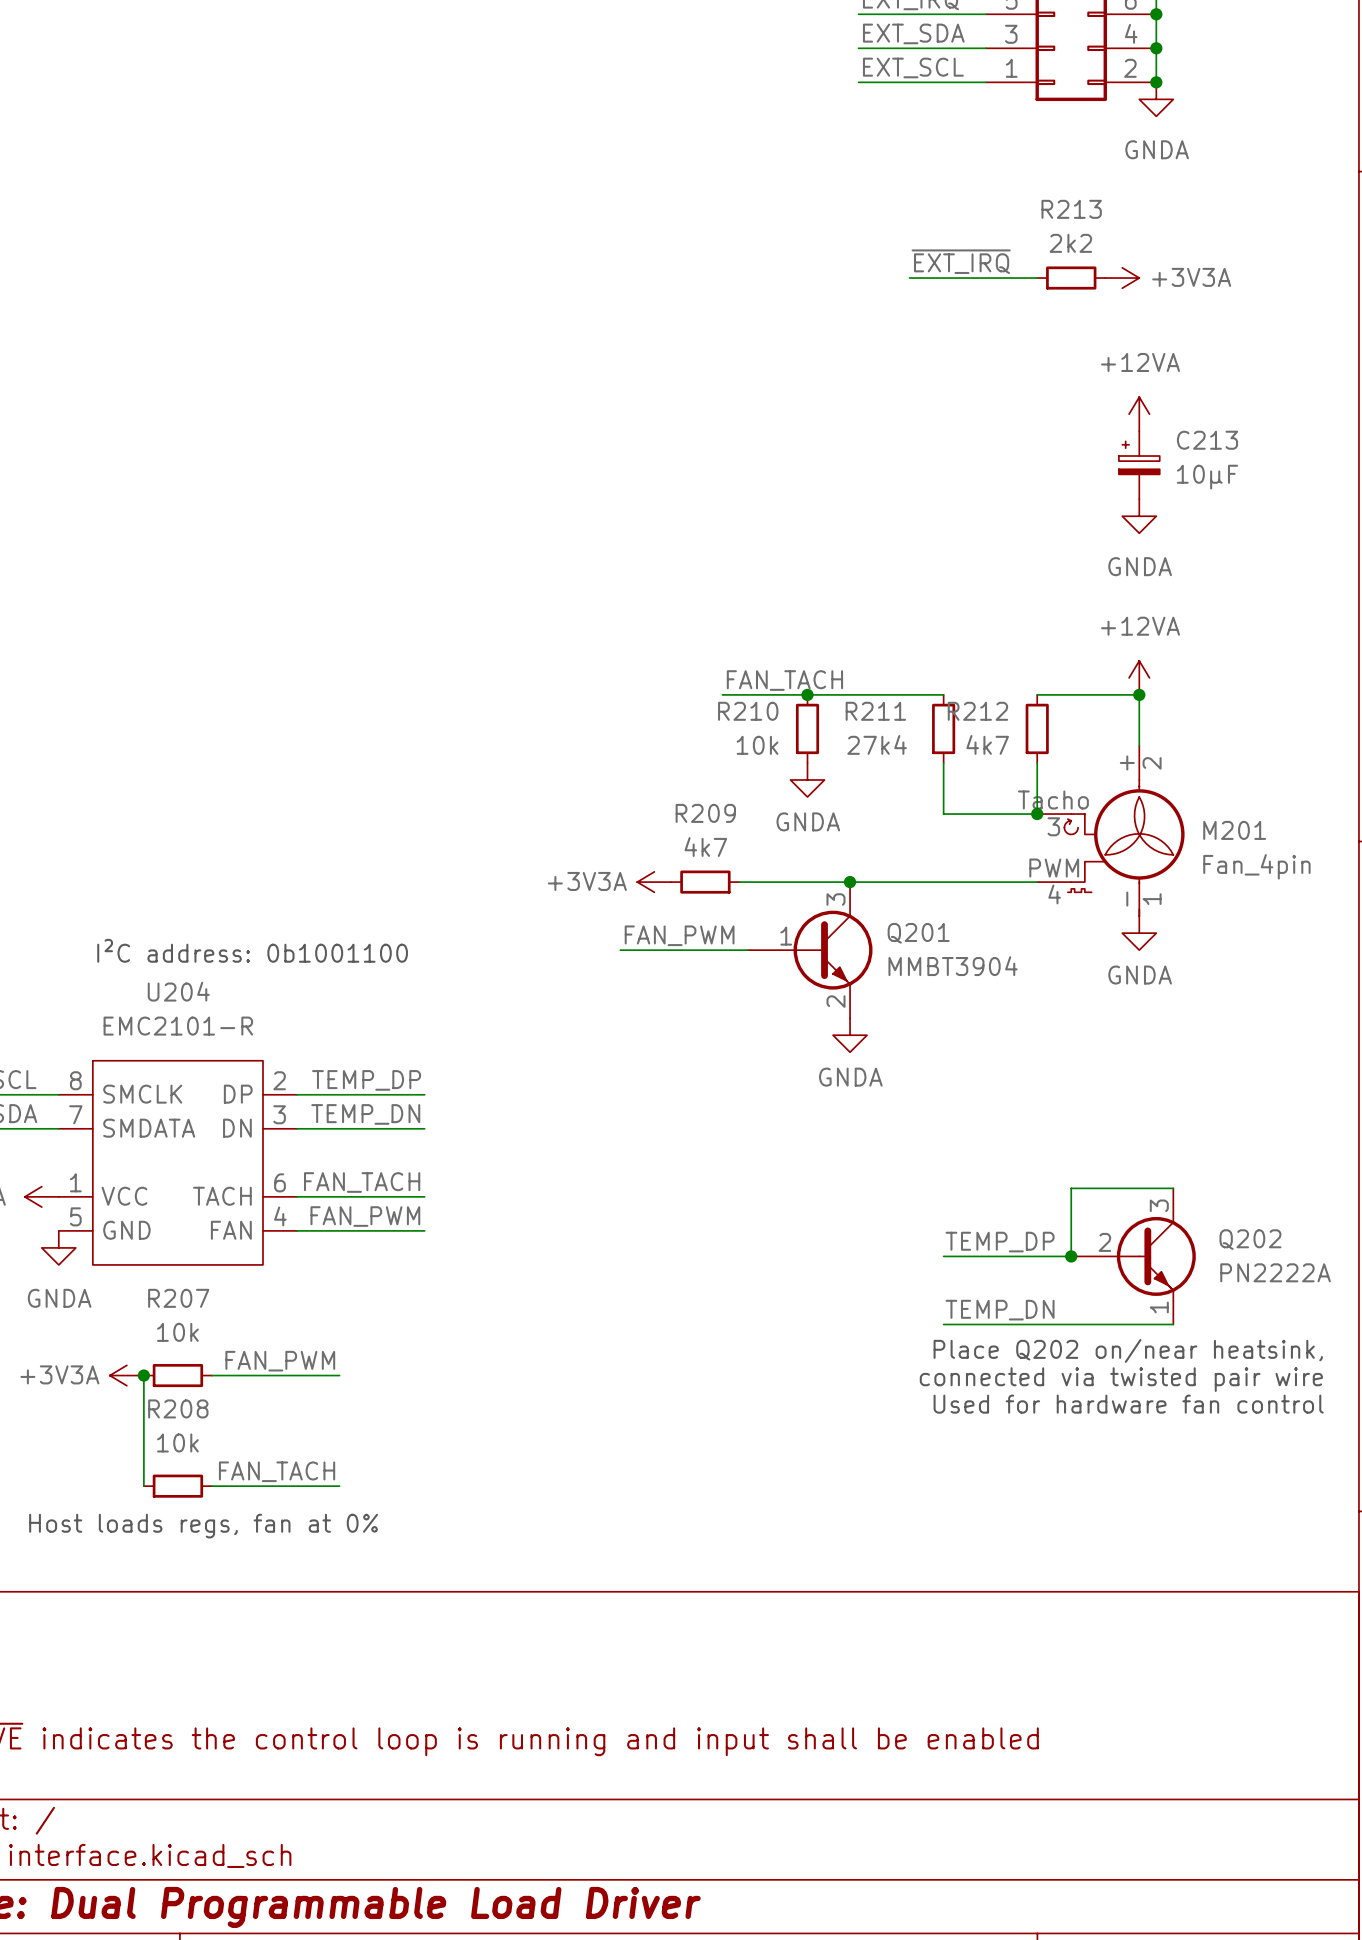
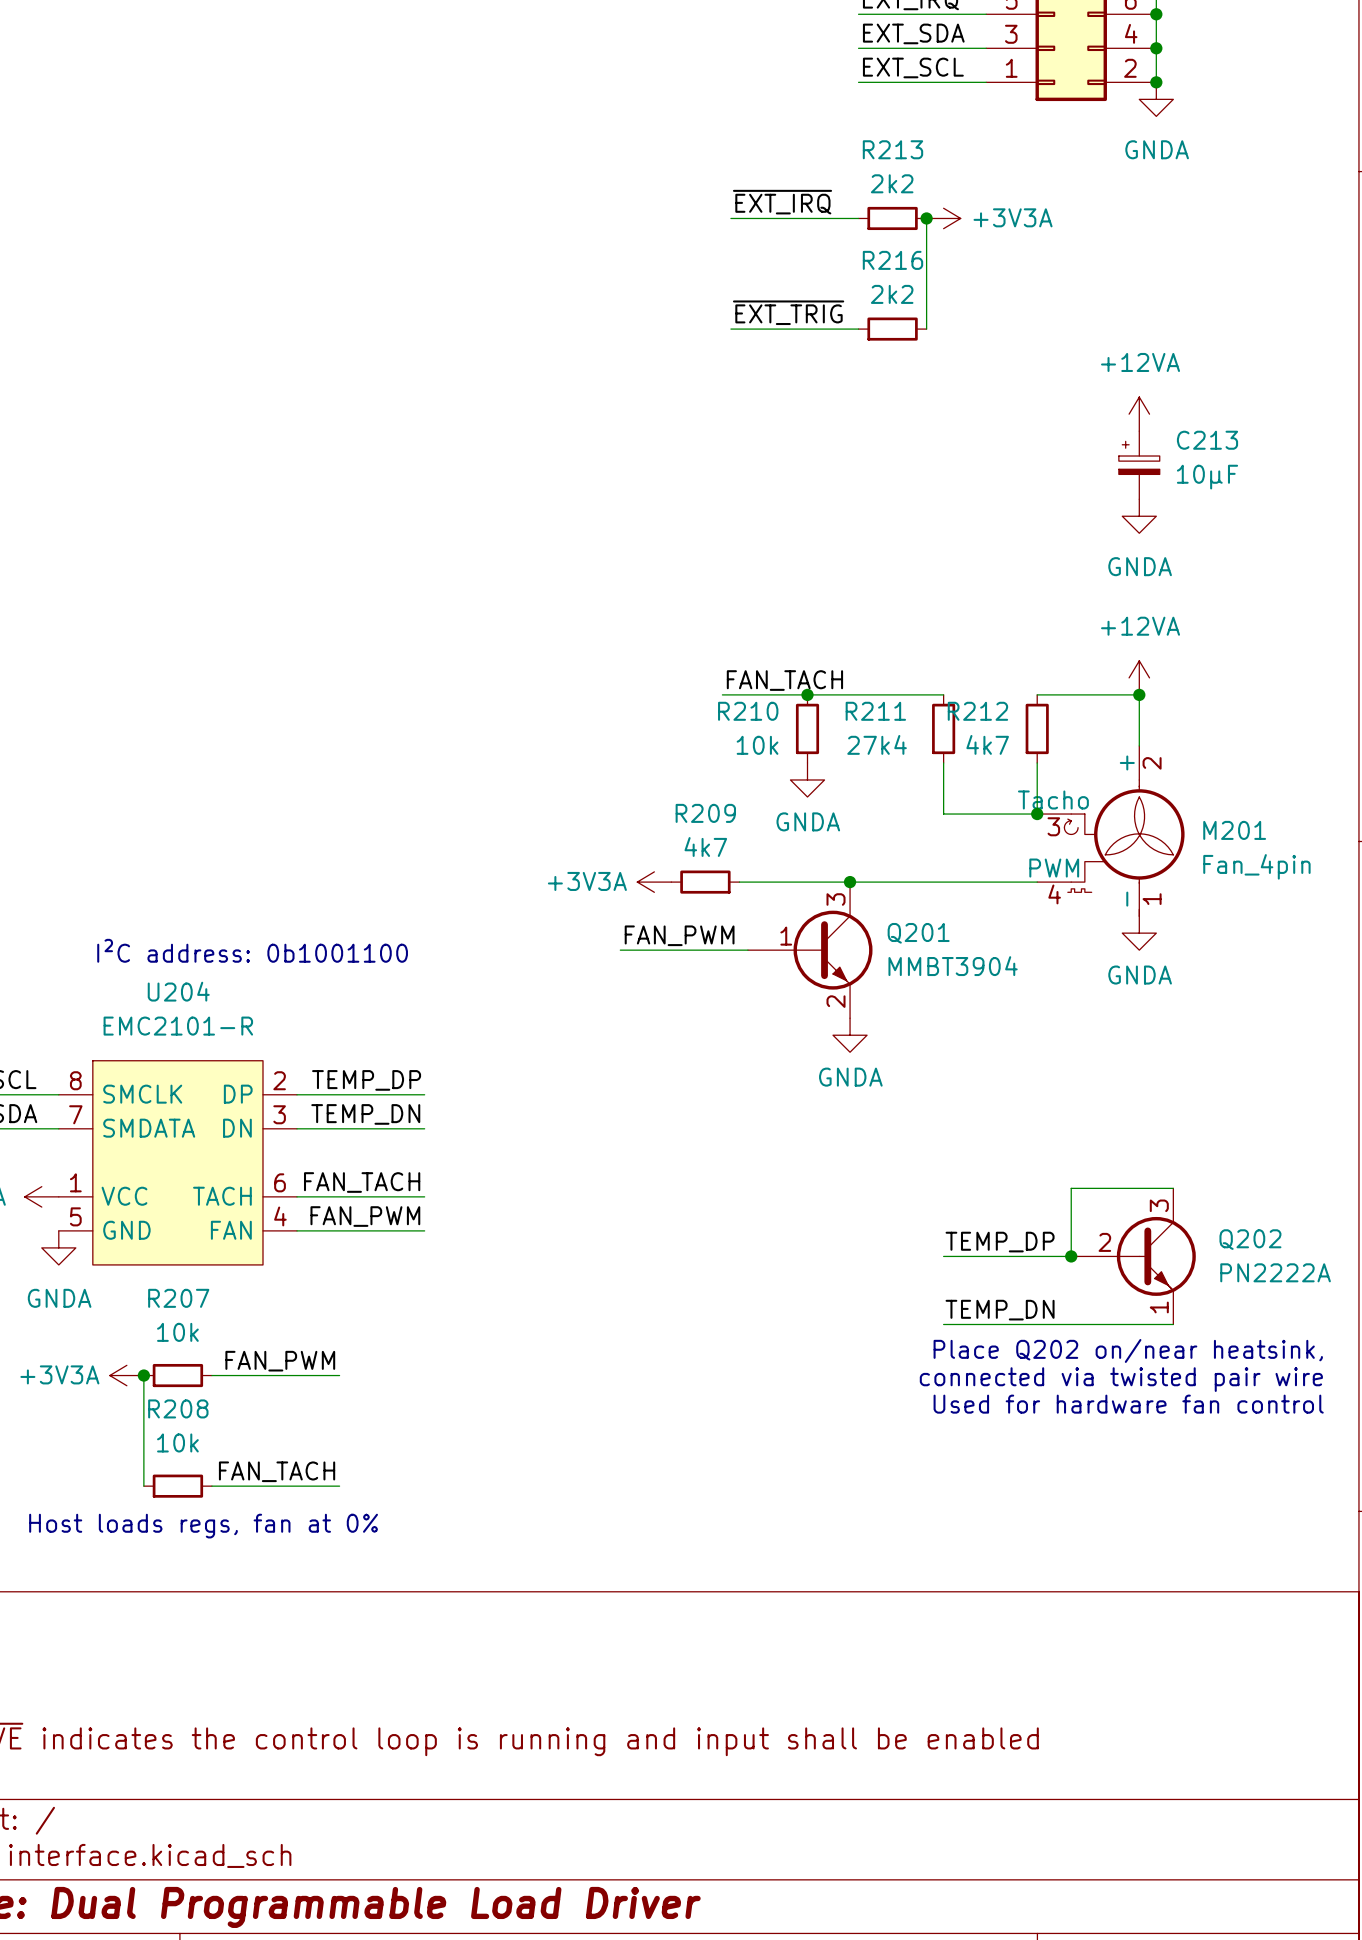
wire: none -> (730, 218) (858, 218)
wire: none -> (926, 218) (926, 329)
junction: none -> (926, 218)
label position: ~{EXT_IRQ} (961, 261) -> ~{EXT_IRQ} (782, 202)
wire: (909, 278) (1037, 278) -> (730, 329) (858, 329)
R213 position: (1071, 278) -> (892, 218)
power symbol position: +3V3A (1122, 278) -> +3V3A (943, 218)
label: none -> ~{EXT_TRIG} (788, 312)
R216: none -> 2k2 (892, 329)

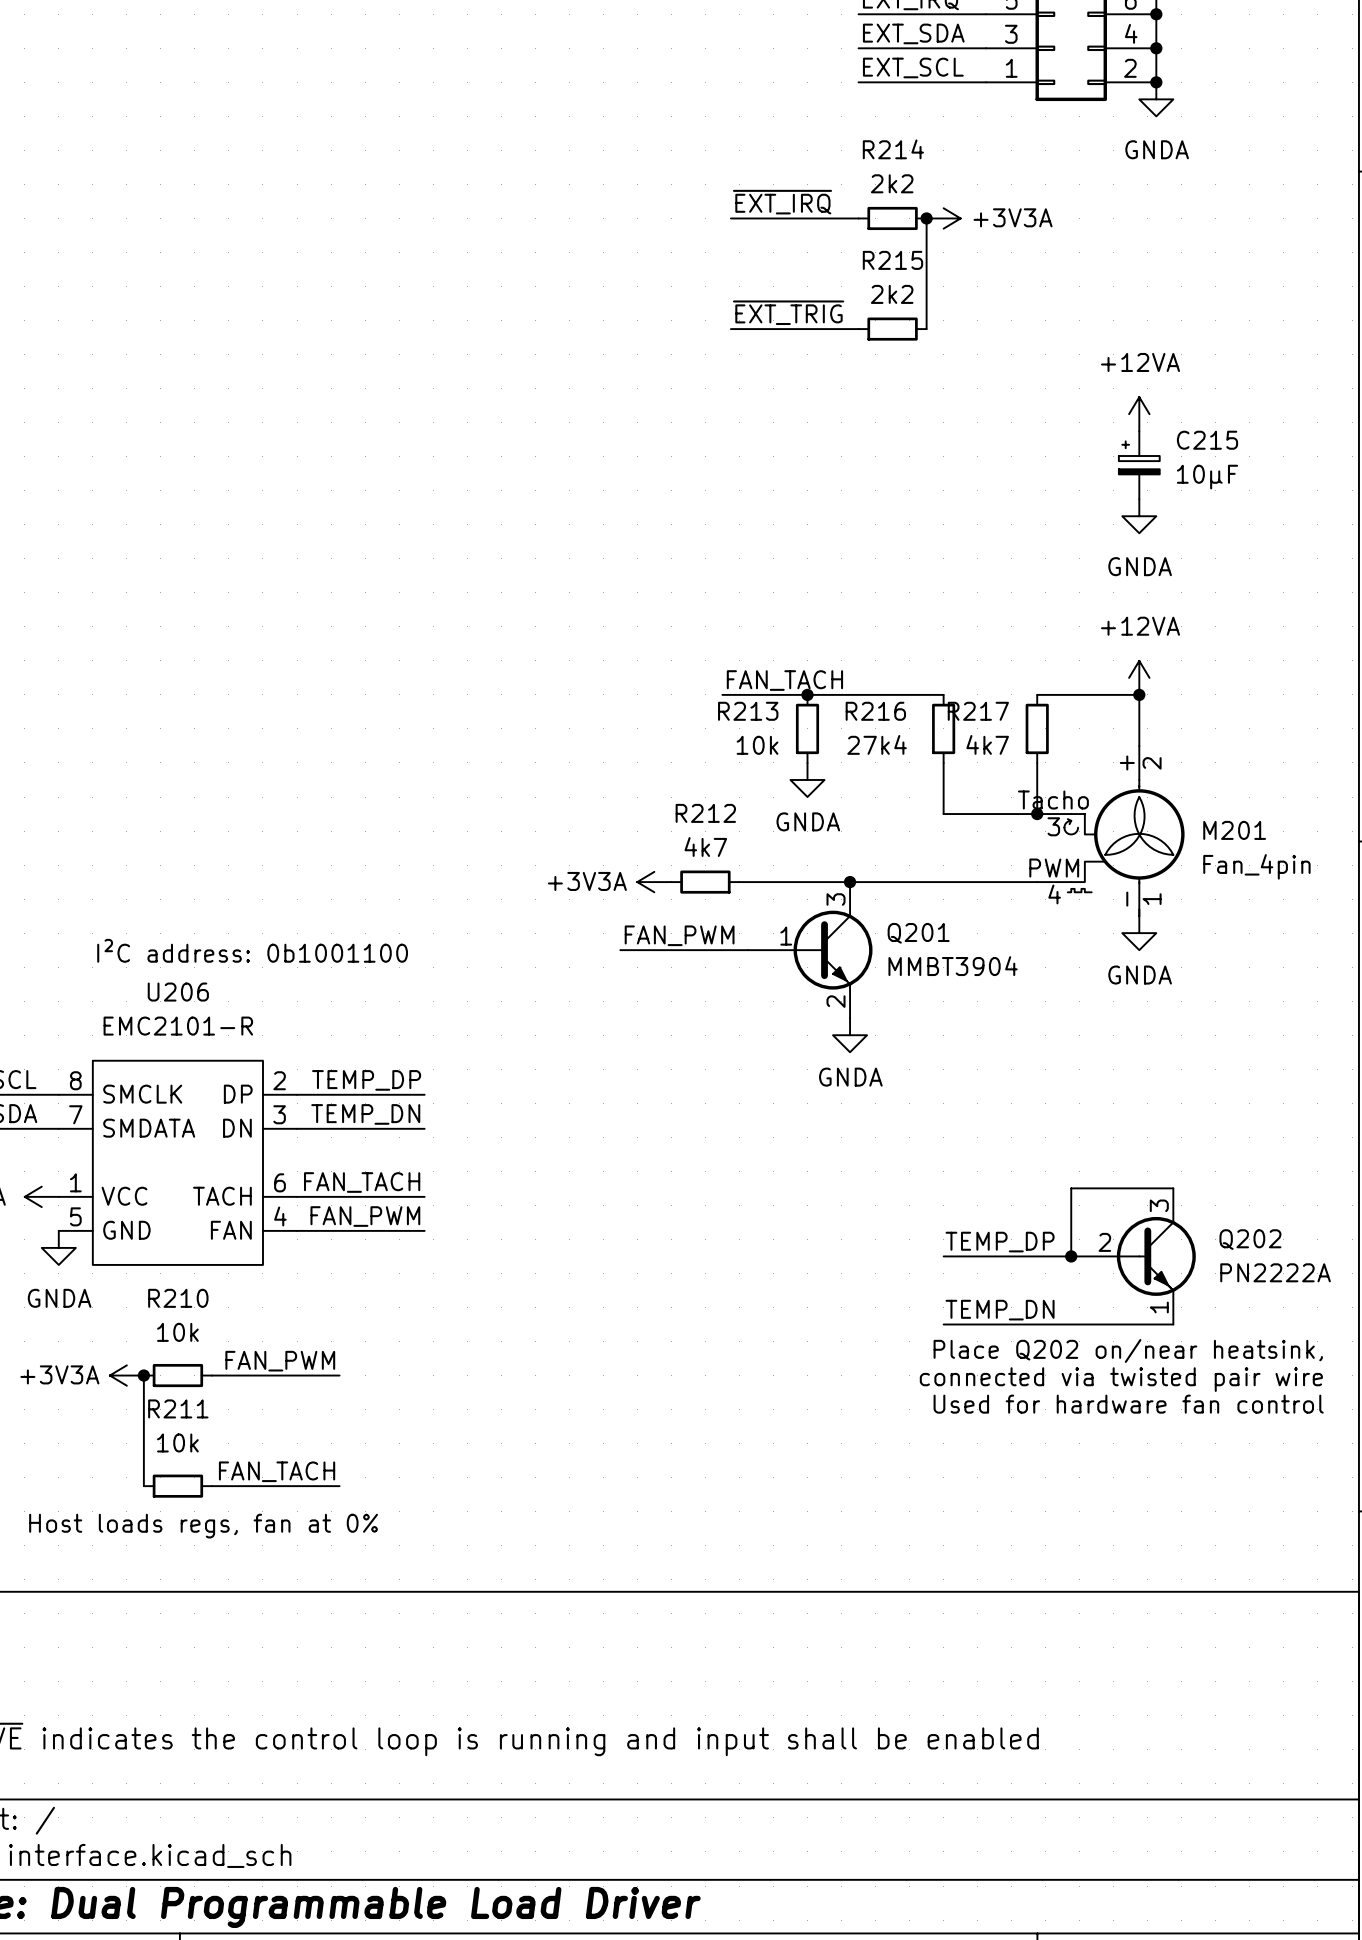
R213 name: R213 (892, 149) -> R214 (893, 149)
R216 name: R216 (892, 260) -> R215 (892, 260)
C213 name: C213 (1207, 440) -> C215 (1207, 440)
R210 name: R210 (748, 711) -> R213 (748, 711)
R211 name: R211 (875, 711) -> R216 (875, 711)
R212 name: R212 (977, 711) -> R217 (978, 711)
R209 name: R209 (705, 813) -> R212 (705, 813)
U204 name: U204 (178, 991) -> U206 (178, 992)
R207 name: R207 (178, 1298) -> R210 (178, 1298)
R208 name: R208 (178, 1408) -> R211 (178, 1408)

